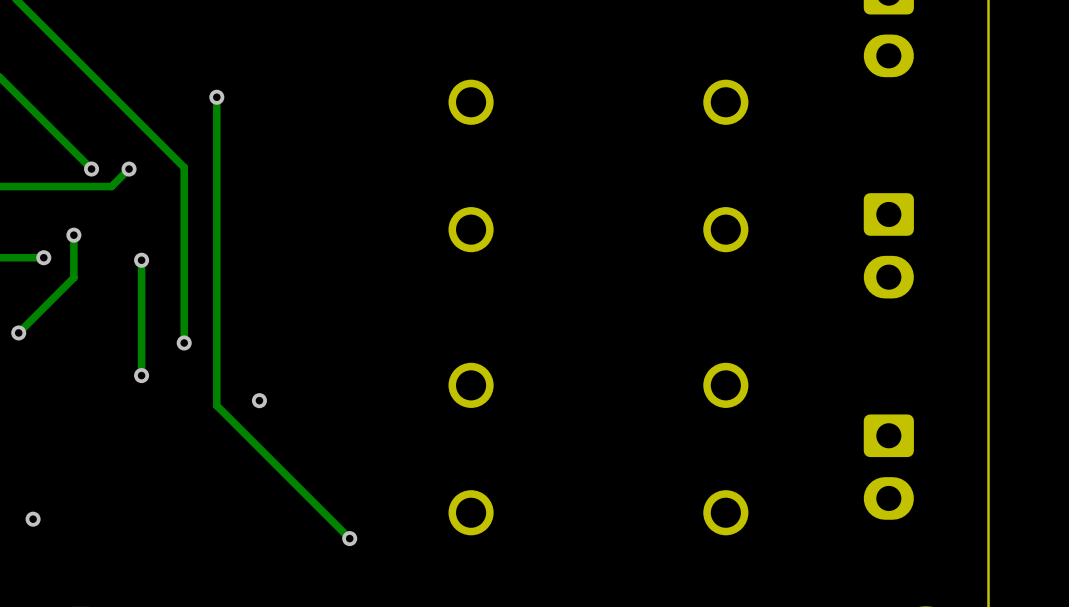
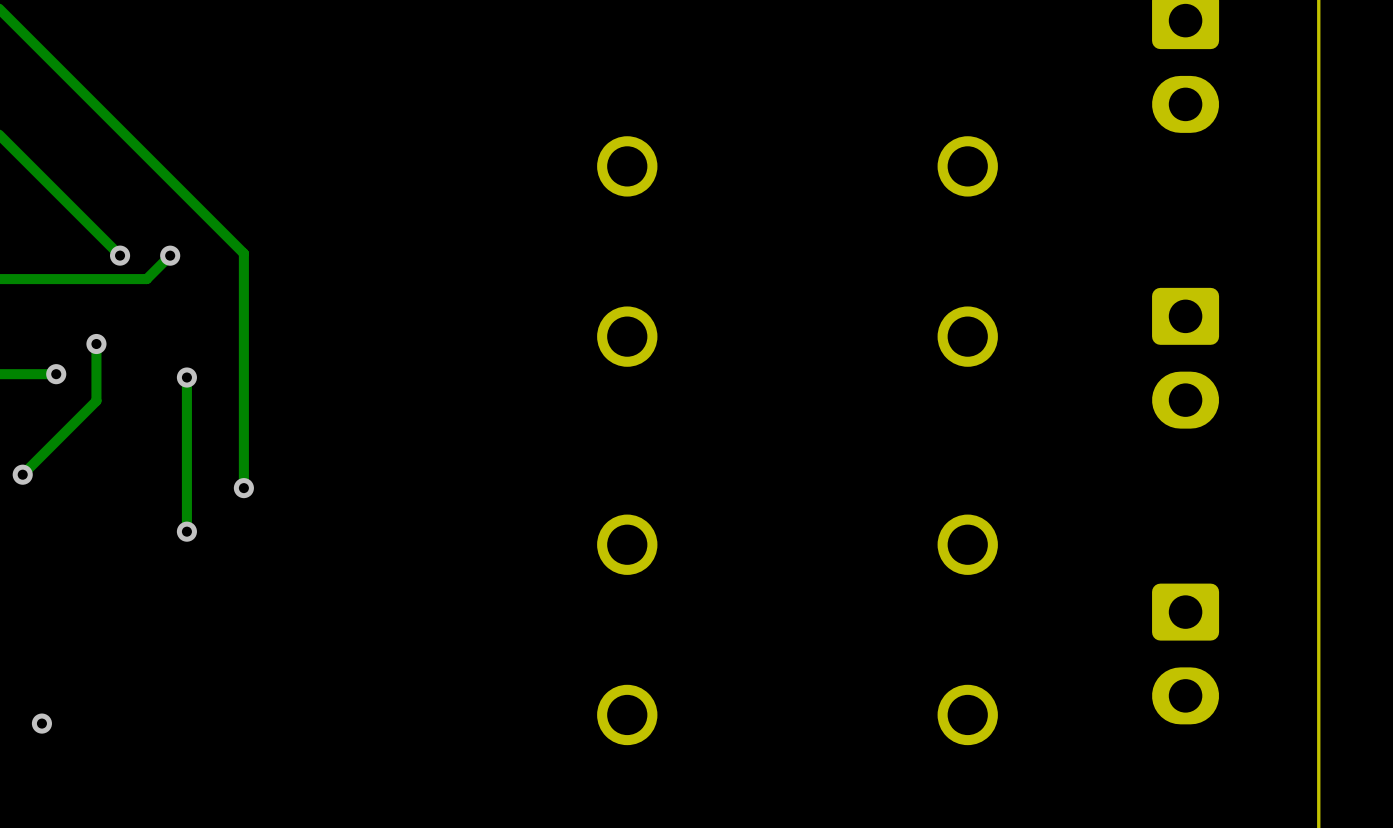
track: (216, 97) (216, 405) (349, 538) -> none
via: (216, 97) -> none
via: (259, 400) -> none
via: (349, 538) -> none

